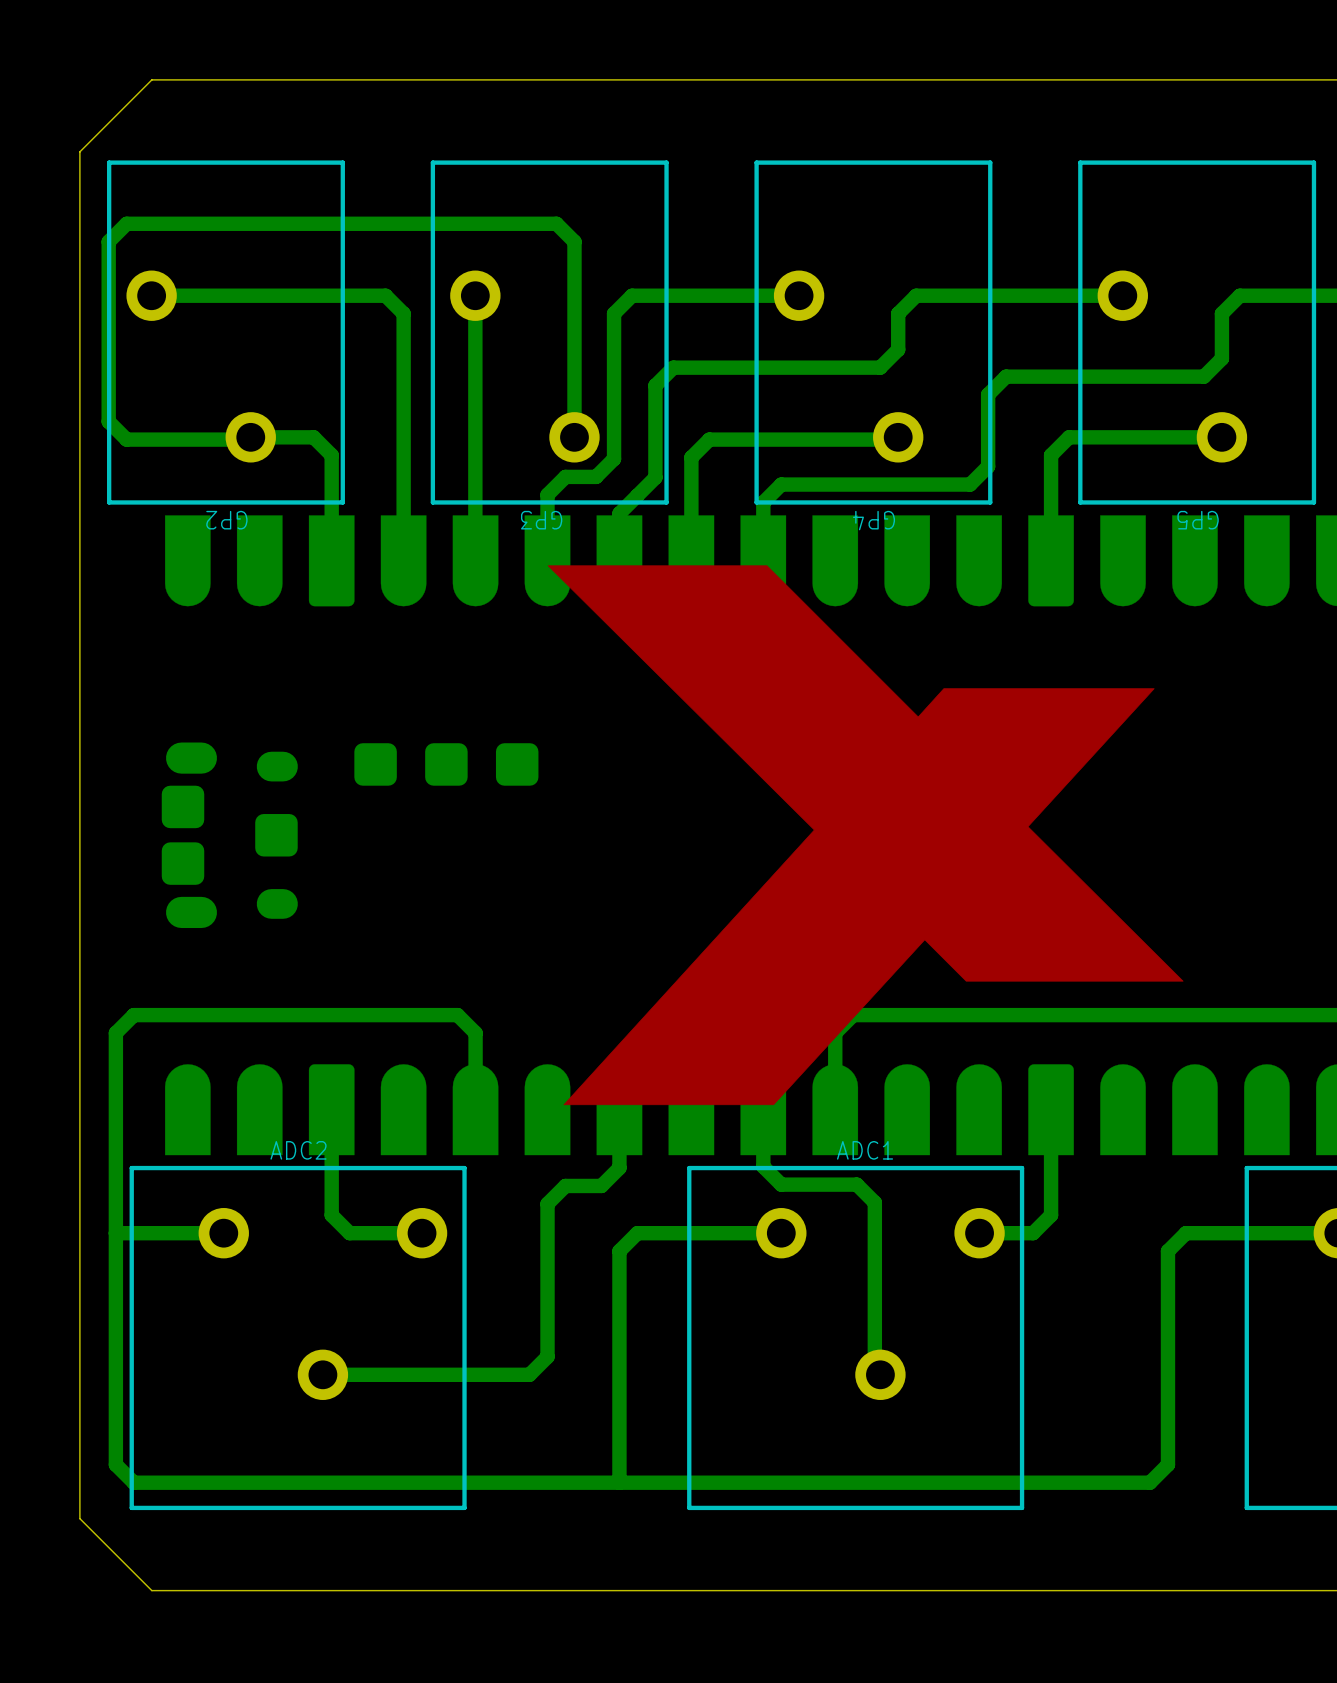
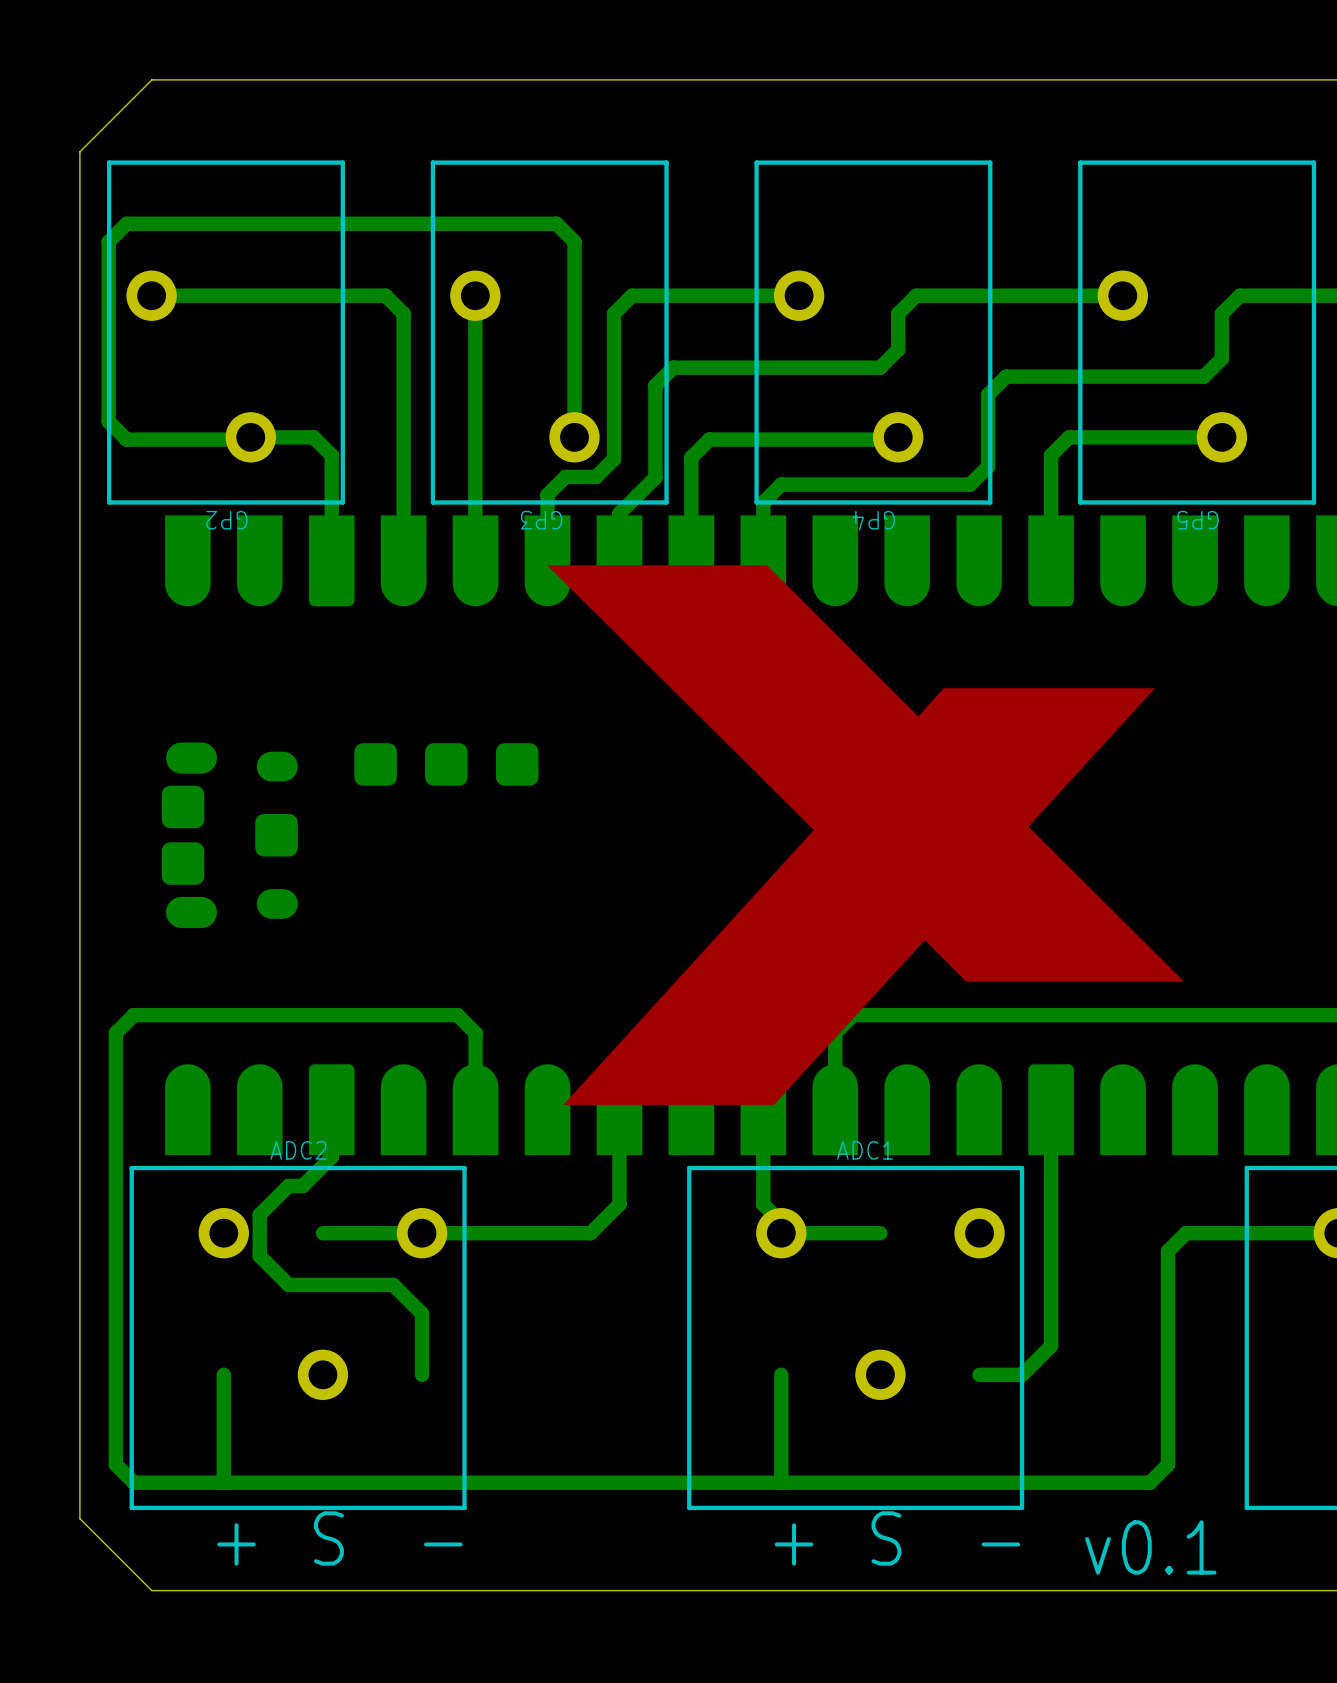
bottom track: (331, 1157) (331, 1215) (349, 1233) -> (322, 1233) (349, 1233)
bottom track: none -> (331, 1157) (302, 1185) (288, 1185) (259, 1214) (259, 1256) (288, 1284) (393, 1284) (422, 1313) (422, 1374)
bottom track: (763, 1166) (781, 1184) (856, 1184) (874, 1202) (874, 1374) (880, 1374) -> (763, 1166) (763, 1204) (792, 1233) (880, 1233)
bottom track: (619, 1167) (601, 1185) (565, 1185) (547, 1203) (547, 1356) (529, 1374) (322, 1374) -> (619, 1167) (619, 1204) (590, 1233) (422, 1233)
bottom track: (1051, 1215) (1033, 1233) (979, 1233) -> (1051, 1215) (1051, 1346) (1022, 1374) (979, 1374)
bottom track: (115, 1233) (223, 1233) -> none
bottom track: (781, 1233) (637, 1233) (619, 1251) (619, 1482) -> none
bottom track: none -> (223, 1374) (223, 1482)
bottom track: none -> (781, 1374) (781, 1482)
text: none -> S (328, 1538)
text: none -> S (886, 1538)
text: none -> + (236, 1544)
text: none -> - (443, 1544)
text: none -> + (794, 1544)
text: none -> - (1000, 1544)
text: none -> v0.1 (1150, 1547)

